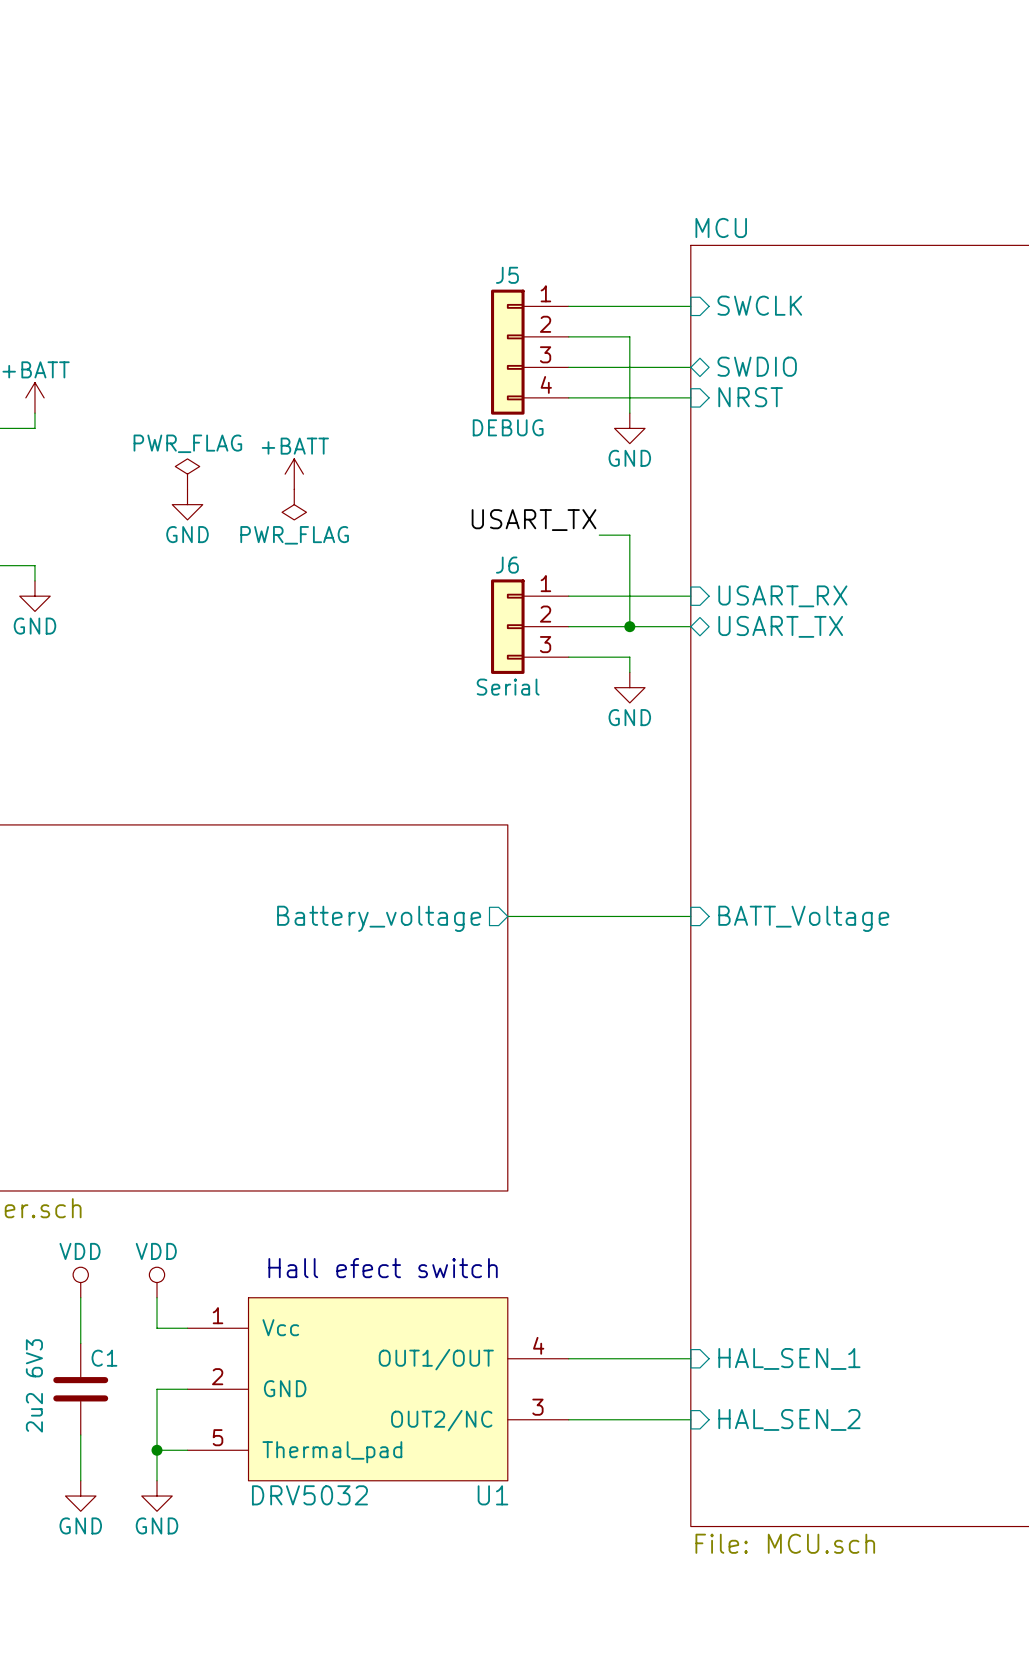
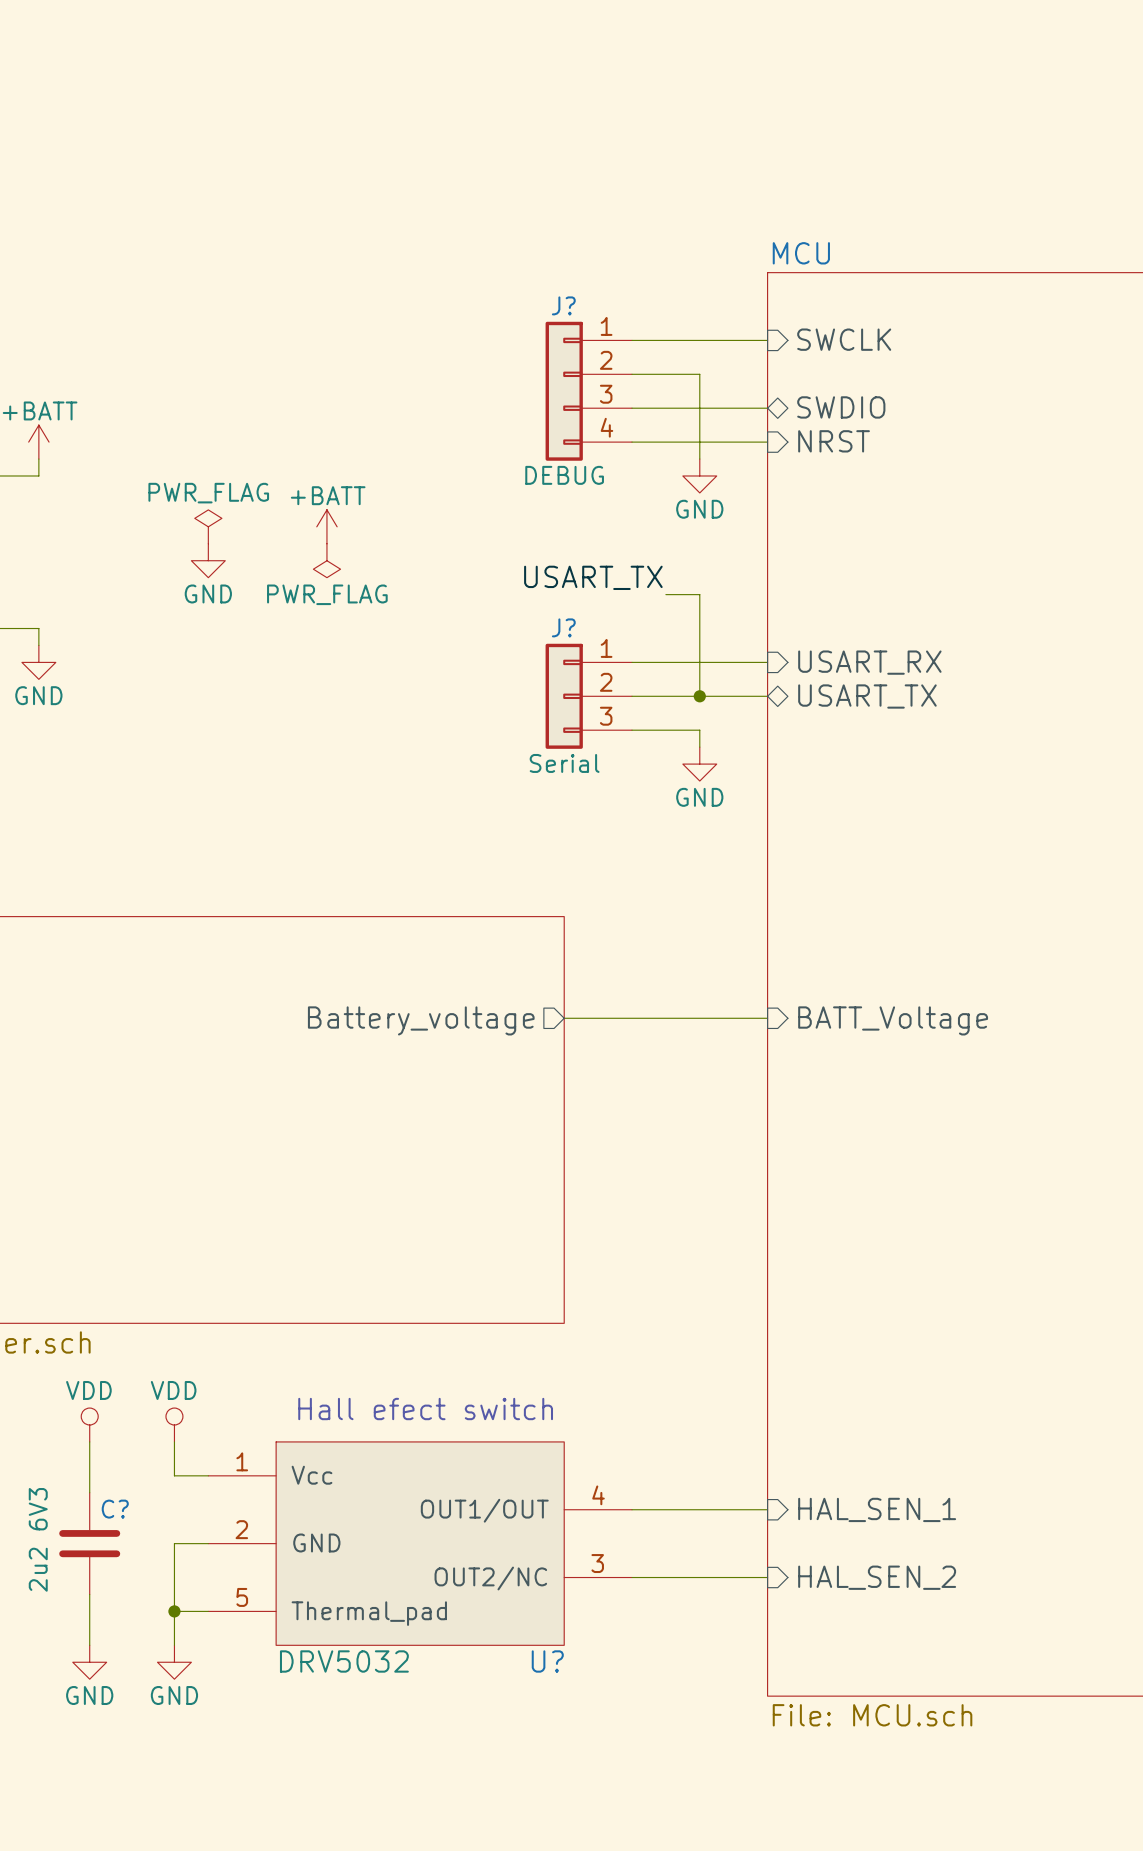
J5 name: J5 (507, 275) -> J? (563, 305)
J6 name: J6 (507, 565) -> J? (563, 627)
C1 name: C1 (104, 1358) -> C? (115, 1509)
U1 name: U1 (492, 1495) -> U? (547, 1661)

